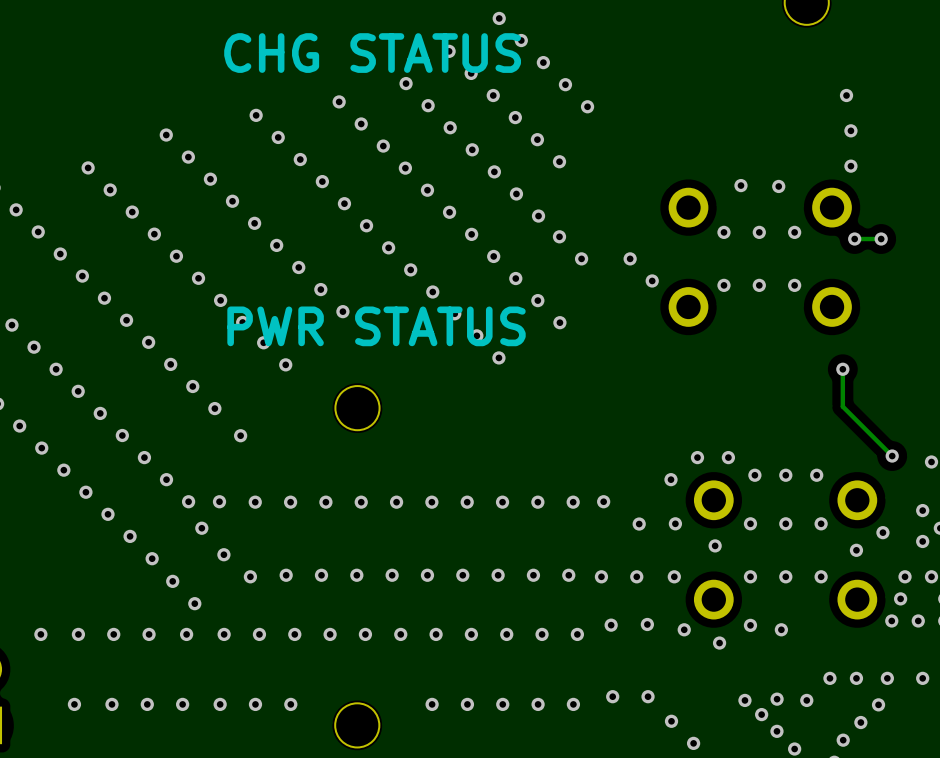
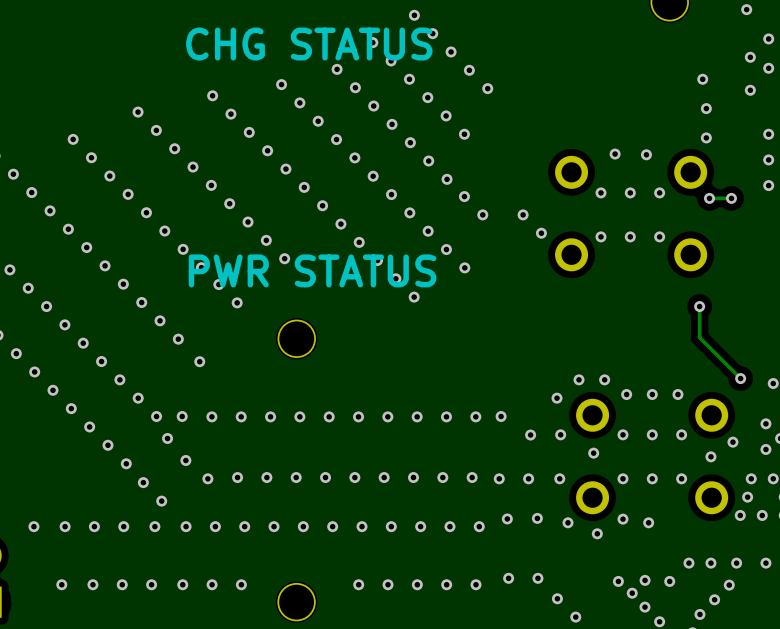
via: none -> (746, 9)
via: none -> (768, 38)
via: none -> (750, 57)
via: none -> (768, 68)
via: none -> (750, 90)
via: none -> (768, 134)
via: none -> (768, 159)
via: none -> (768, 185)

